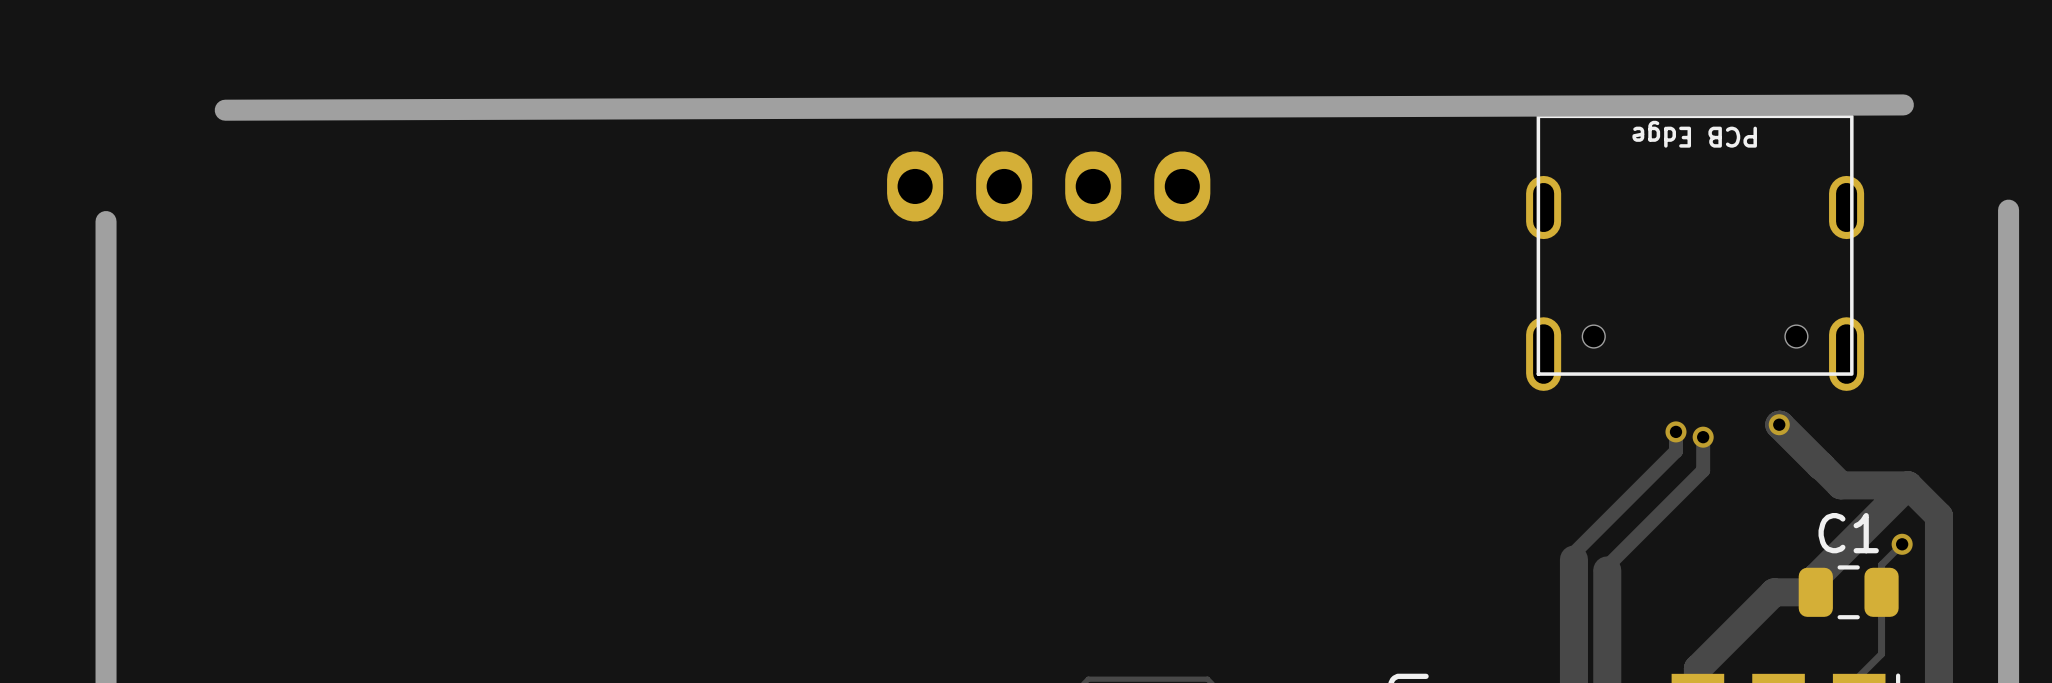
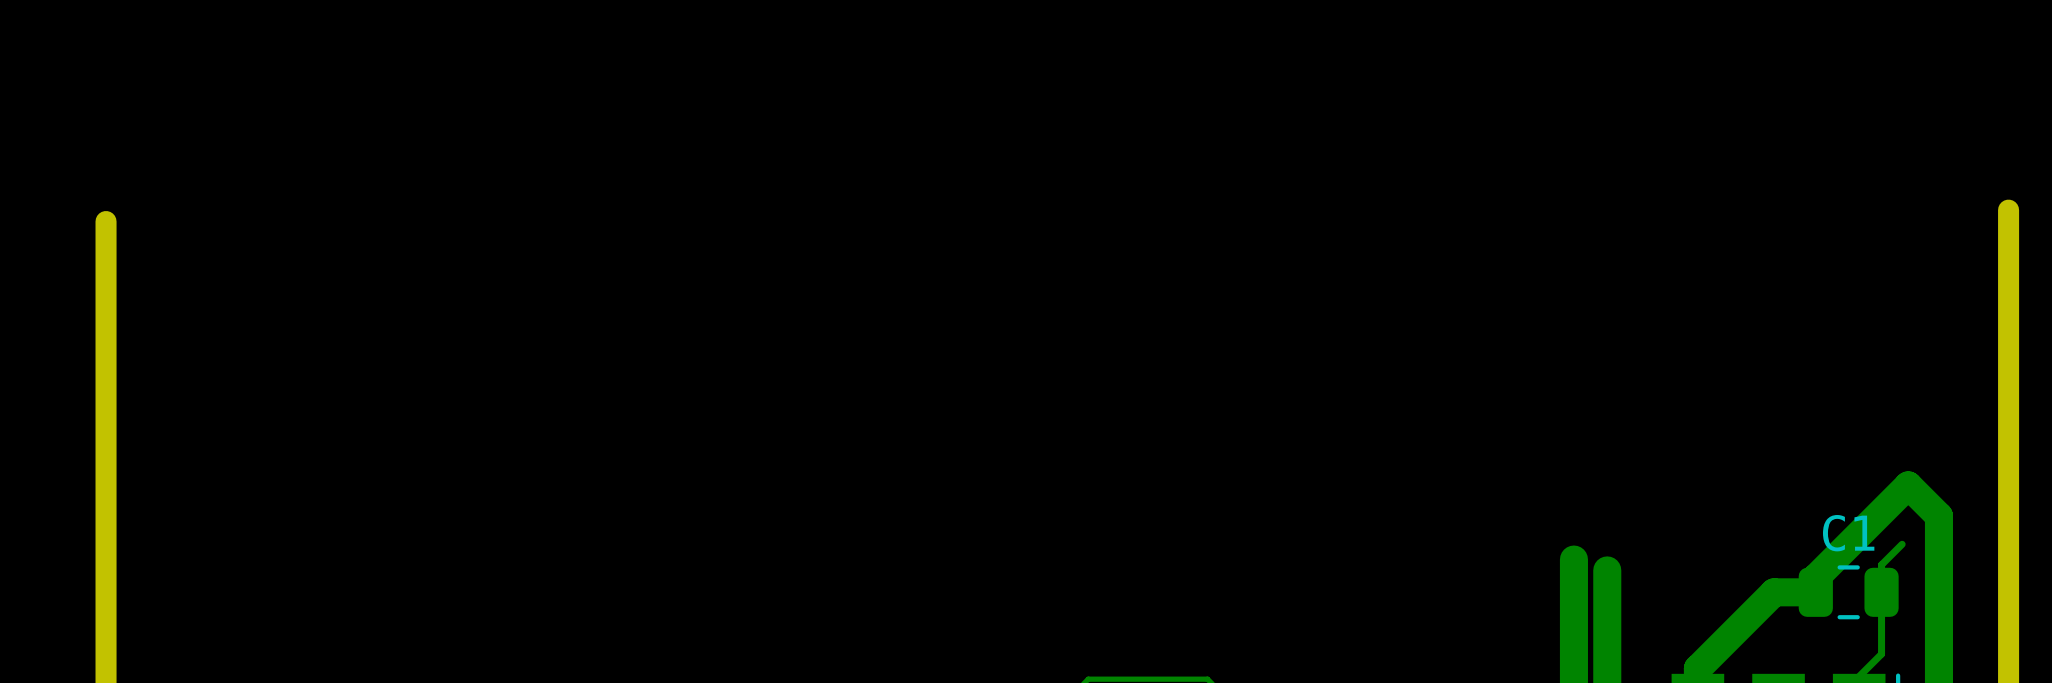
board edge: (1903, 104) (225, 110) -> none
part: (1048, 186) -> none
part: (1695, 252) -> none
via: (1779, 424) -> none
track: (1675, 431) (1675, 451) (1573, 553) (1573, 559) (1569, 559) -> none
via: (1675, 431) -> none
track: (1703, 437) (1703, 470) (1603, 570) (1600, 570) -> none
via: (1703, 437) -> none
track: (1821, 466) (1779, 424) (1840, 485) (1908, 485) -> none
via: (1902, 544) -> none

